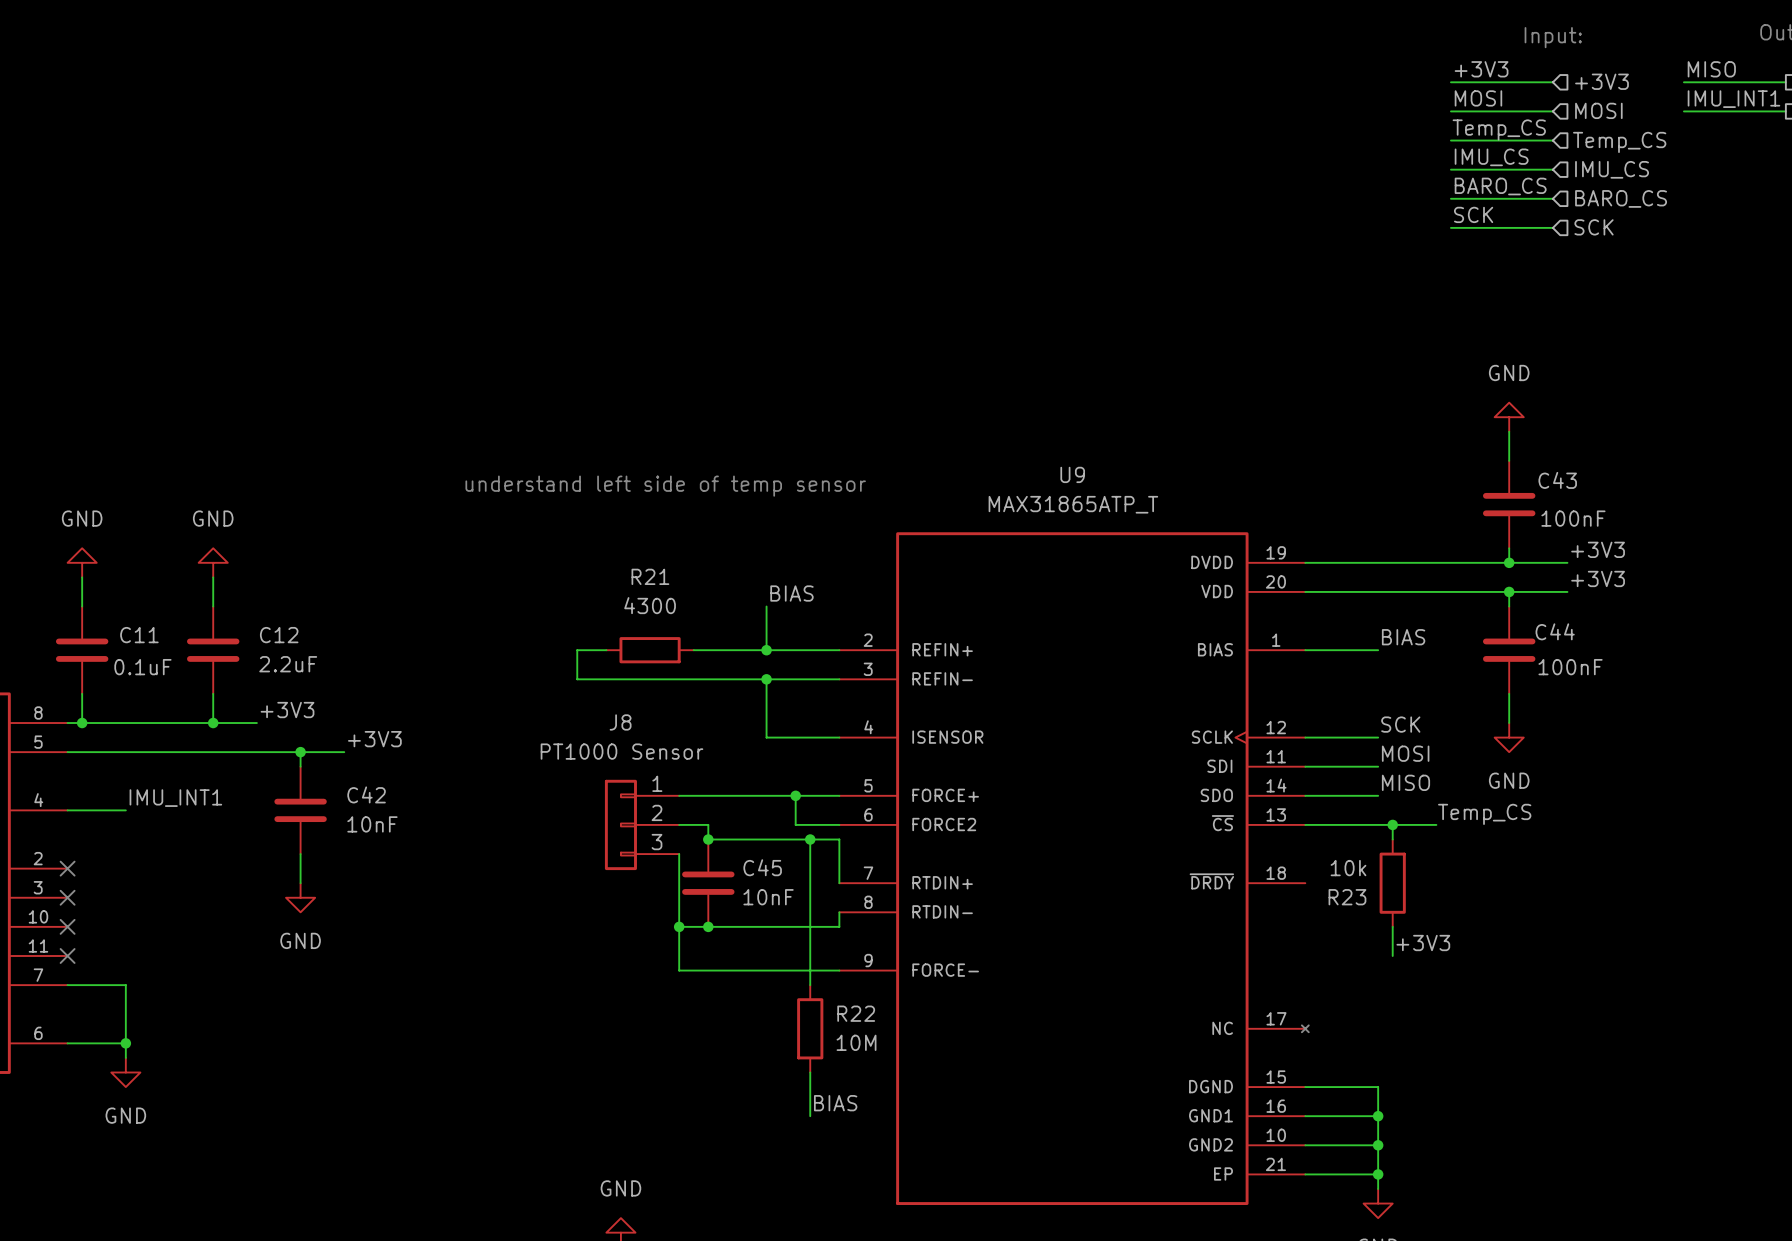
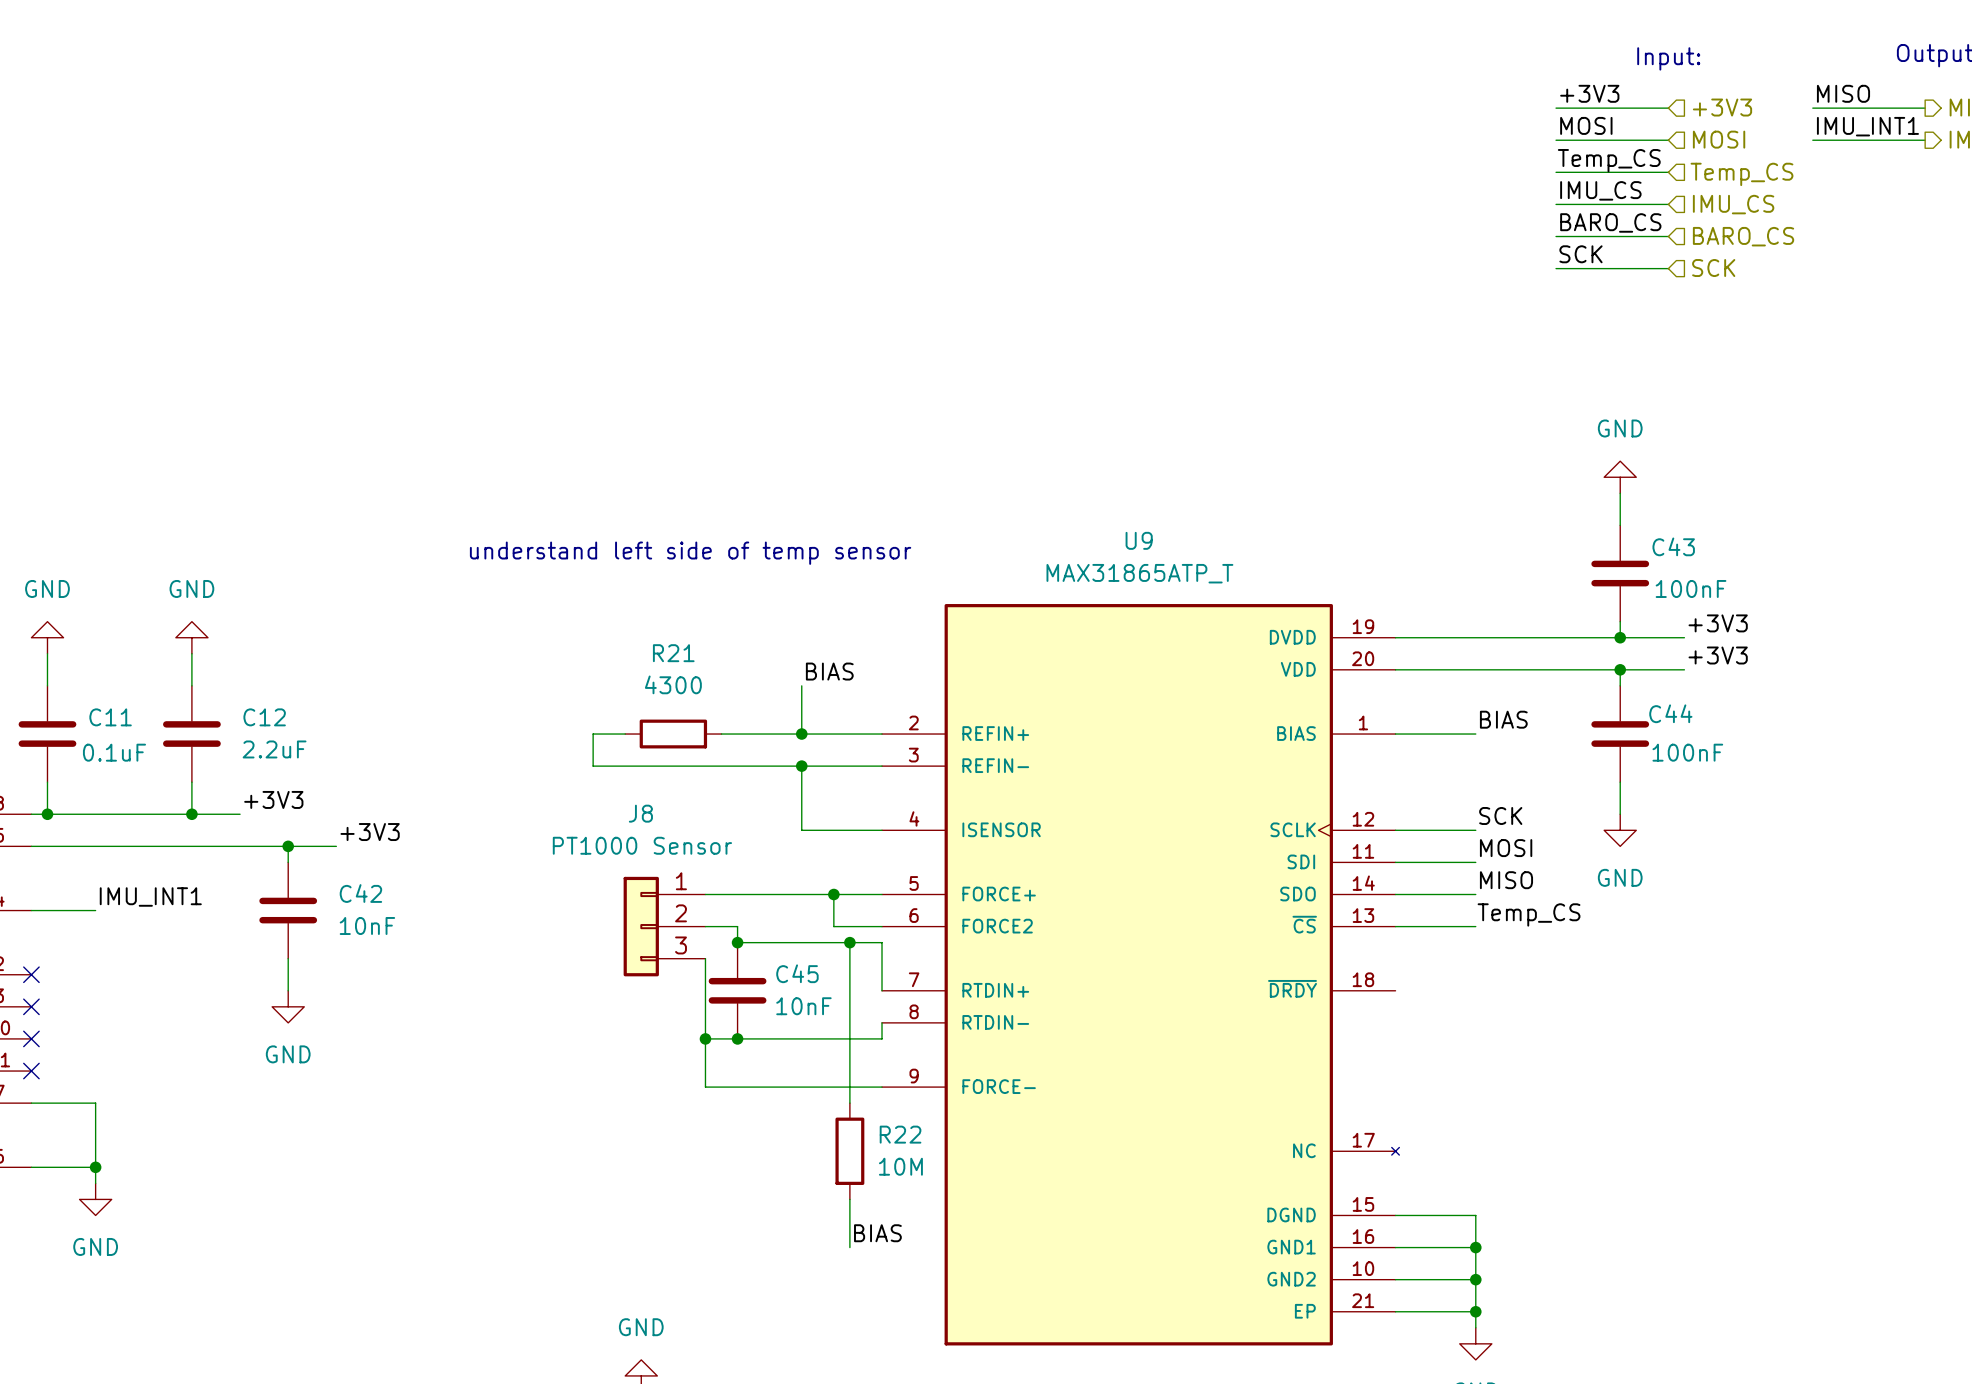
label position: Temp_CS (1484, 814) -> Temp_CS (1529, 914)
wire: (1378, 824) (1436, 824) -> none
wire: (1392, 824) (1392, 839) -> none
junction: (1392, 824) -> none
R23: 10k (1392, 883) -> none
wire: (1392, 926) (1392, 956) -> none
label: +3V3 (1423, 943) -> none

